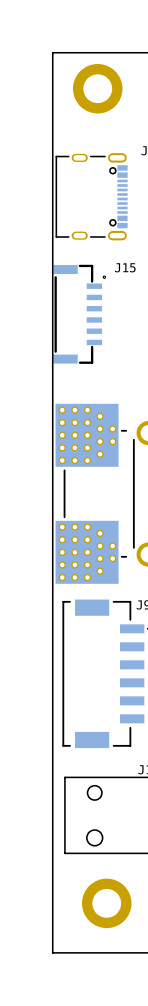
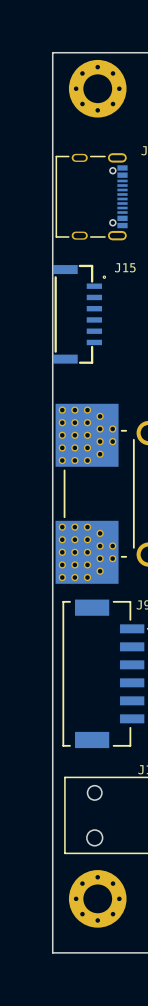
part footprint: [72, 63, 123, 114] -> [68, 59, 127, 118]
part: none -> (97, 898)
part: (106, 903) -> none

